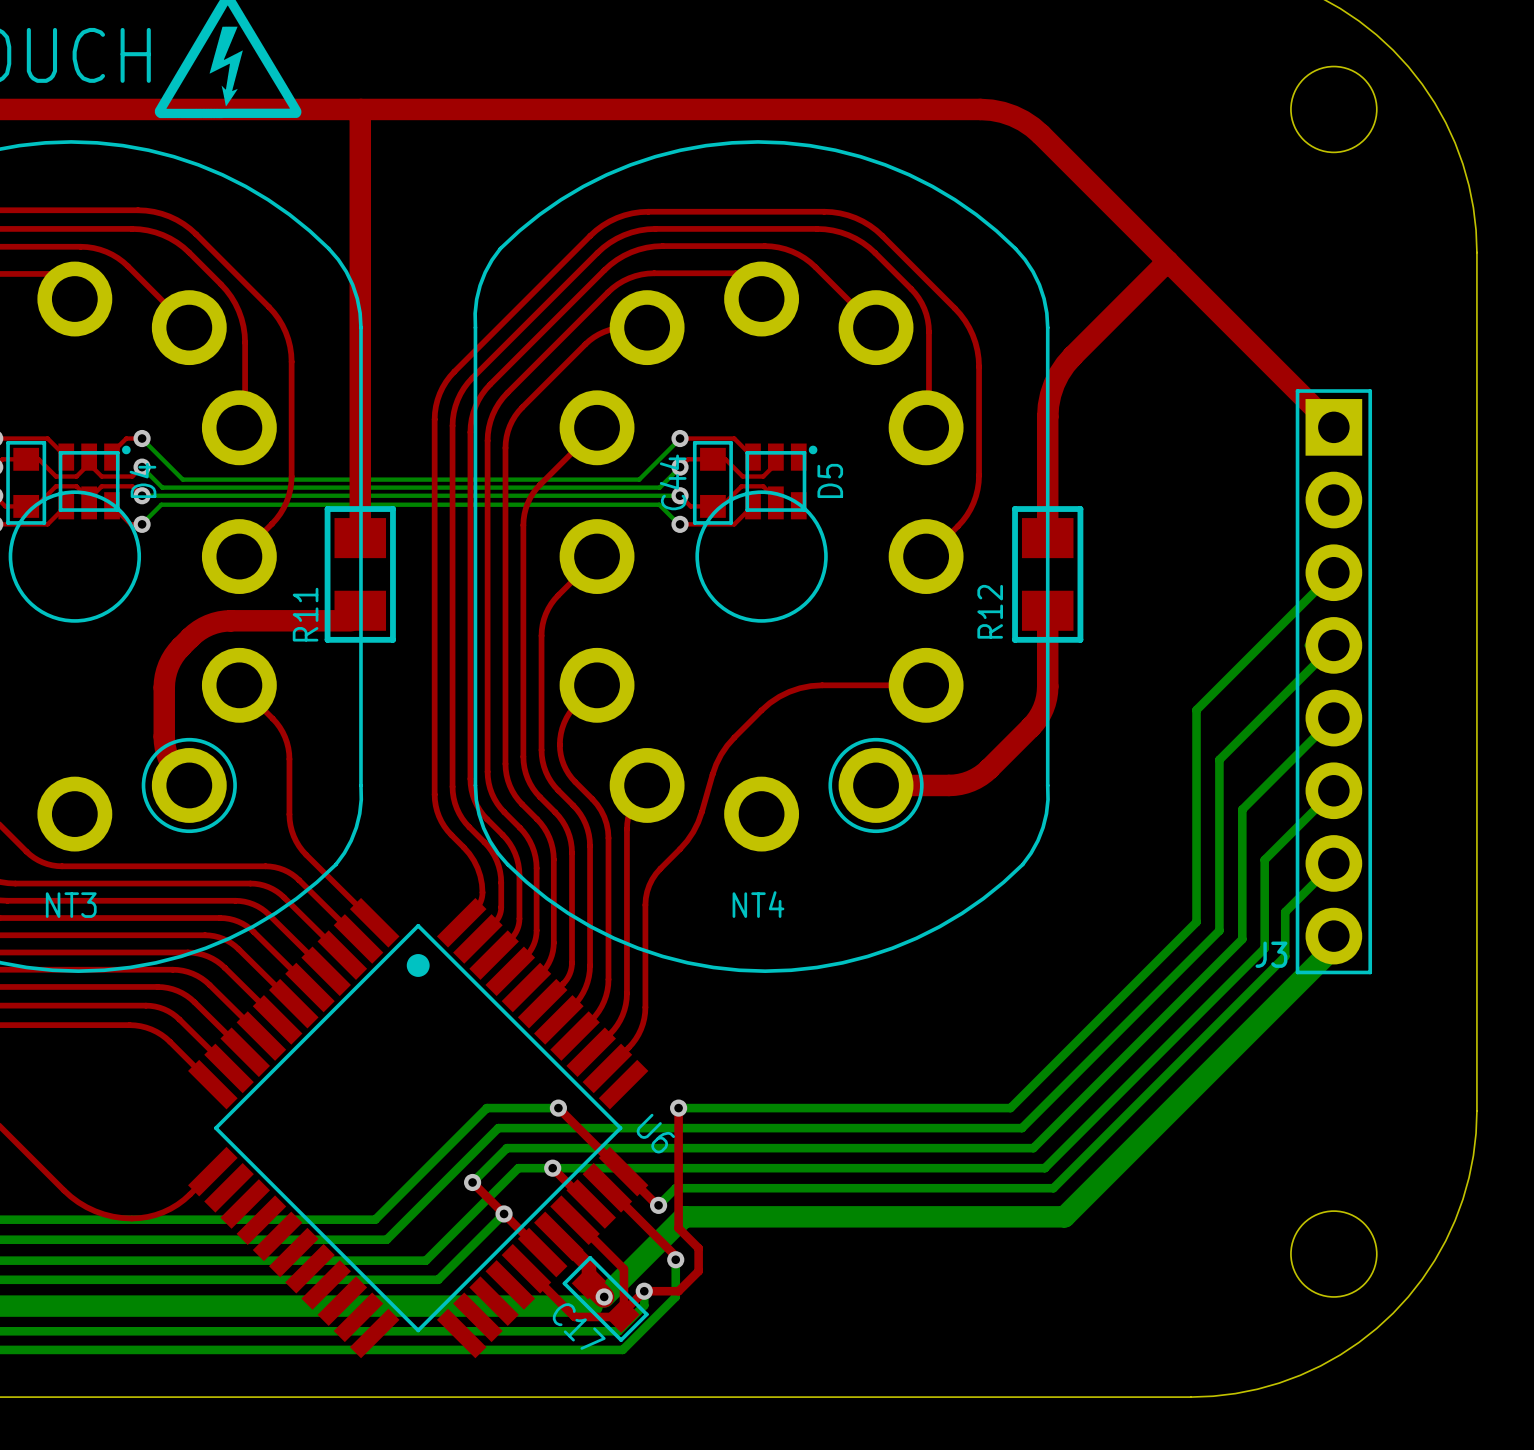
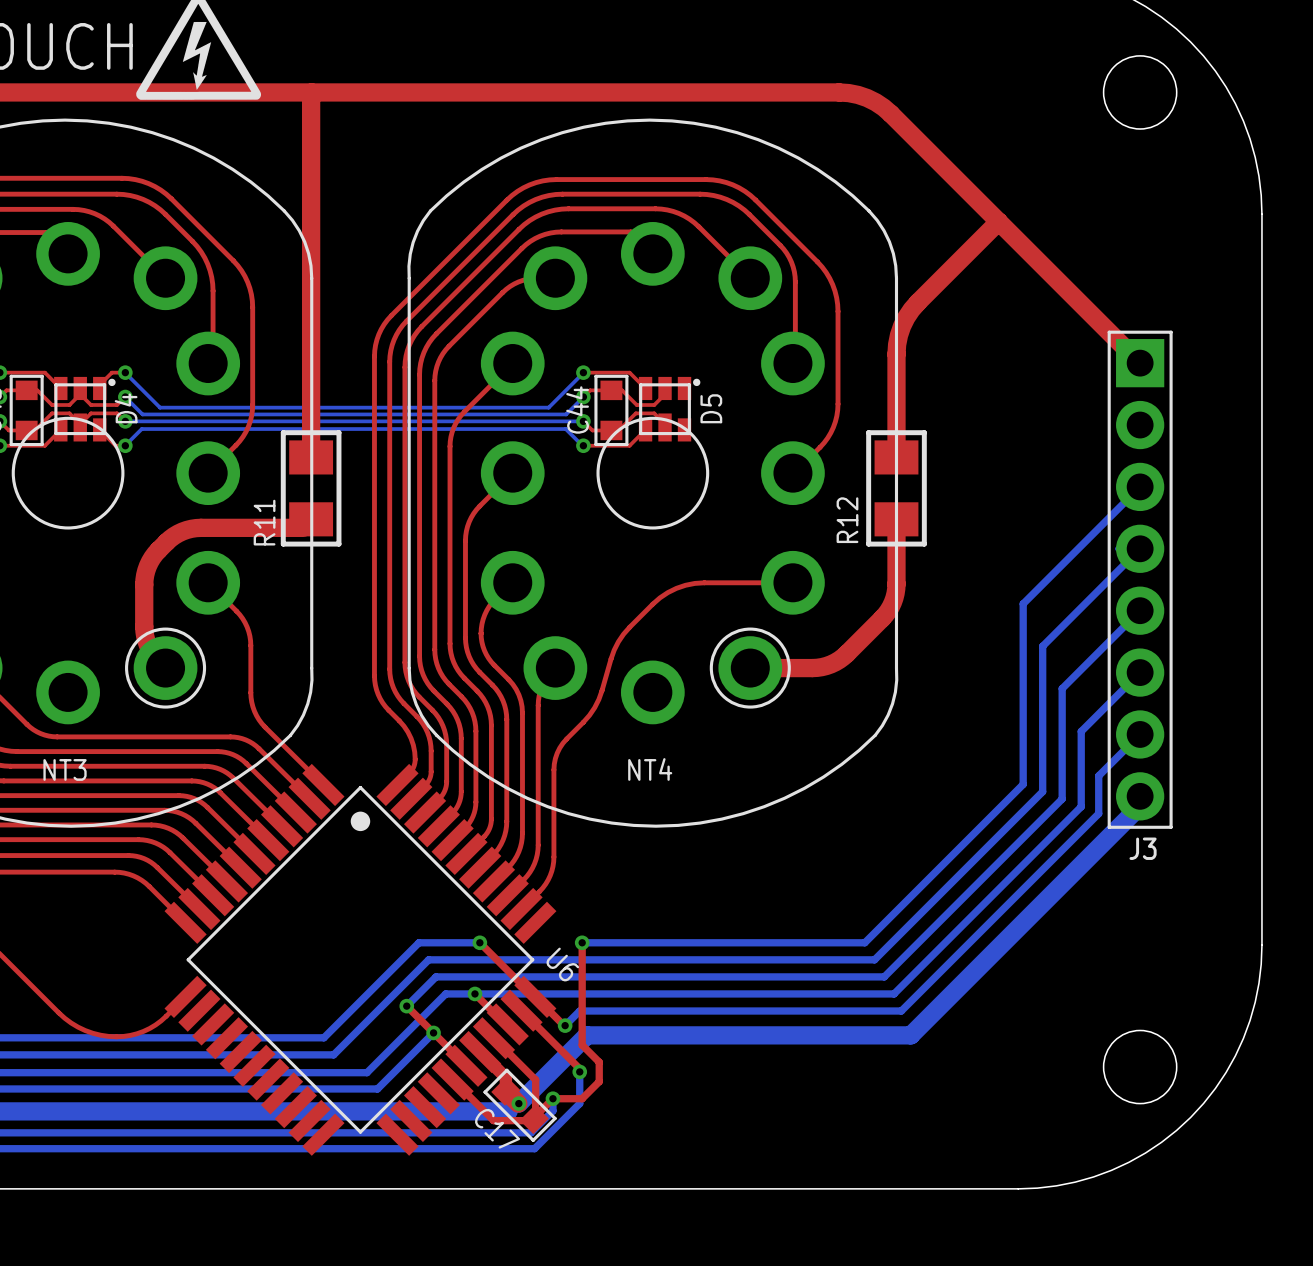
J3 name position: J3 (1271, 954) -> J3 (1143, 848)

